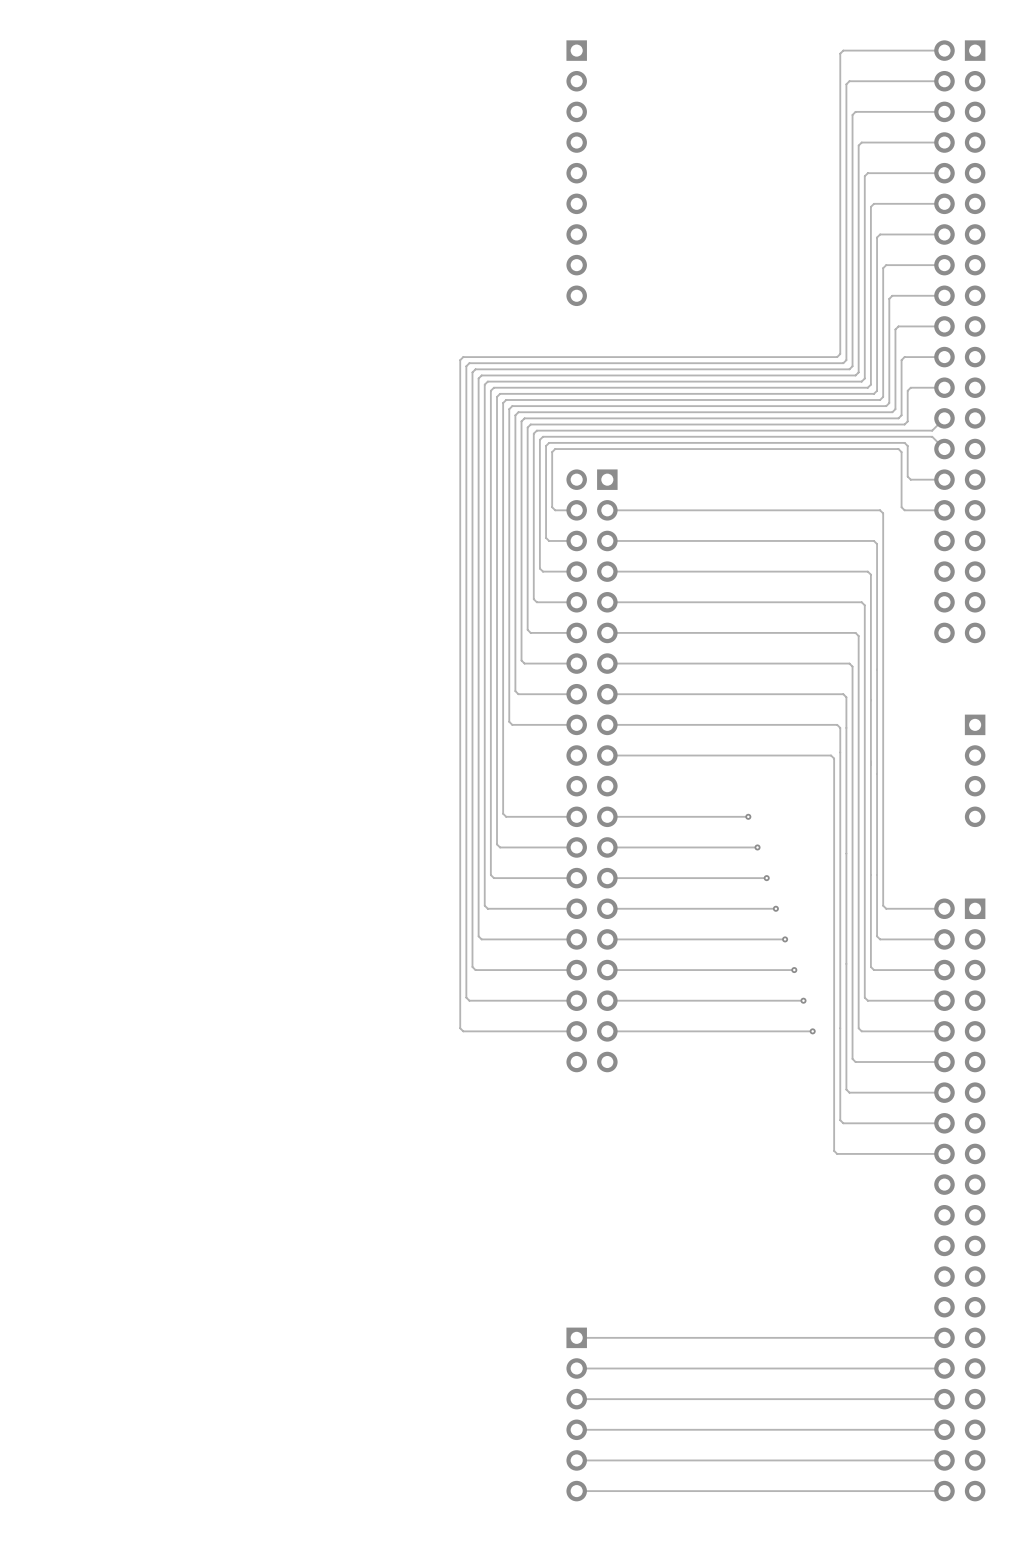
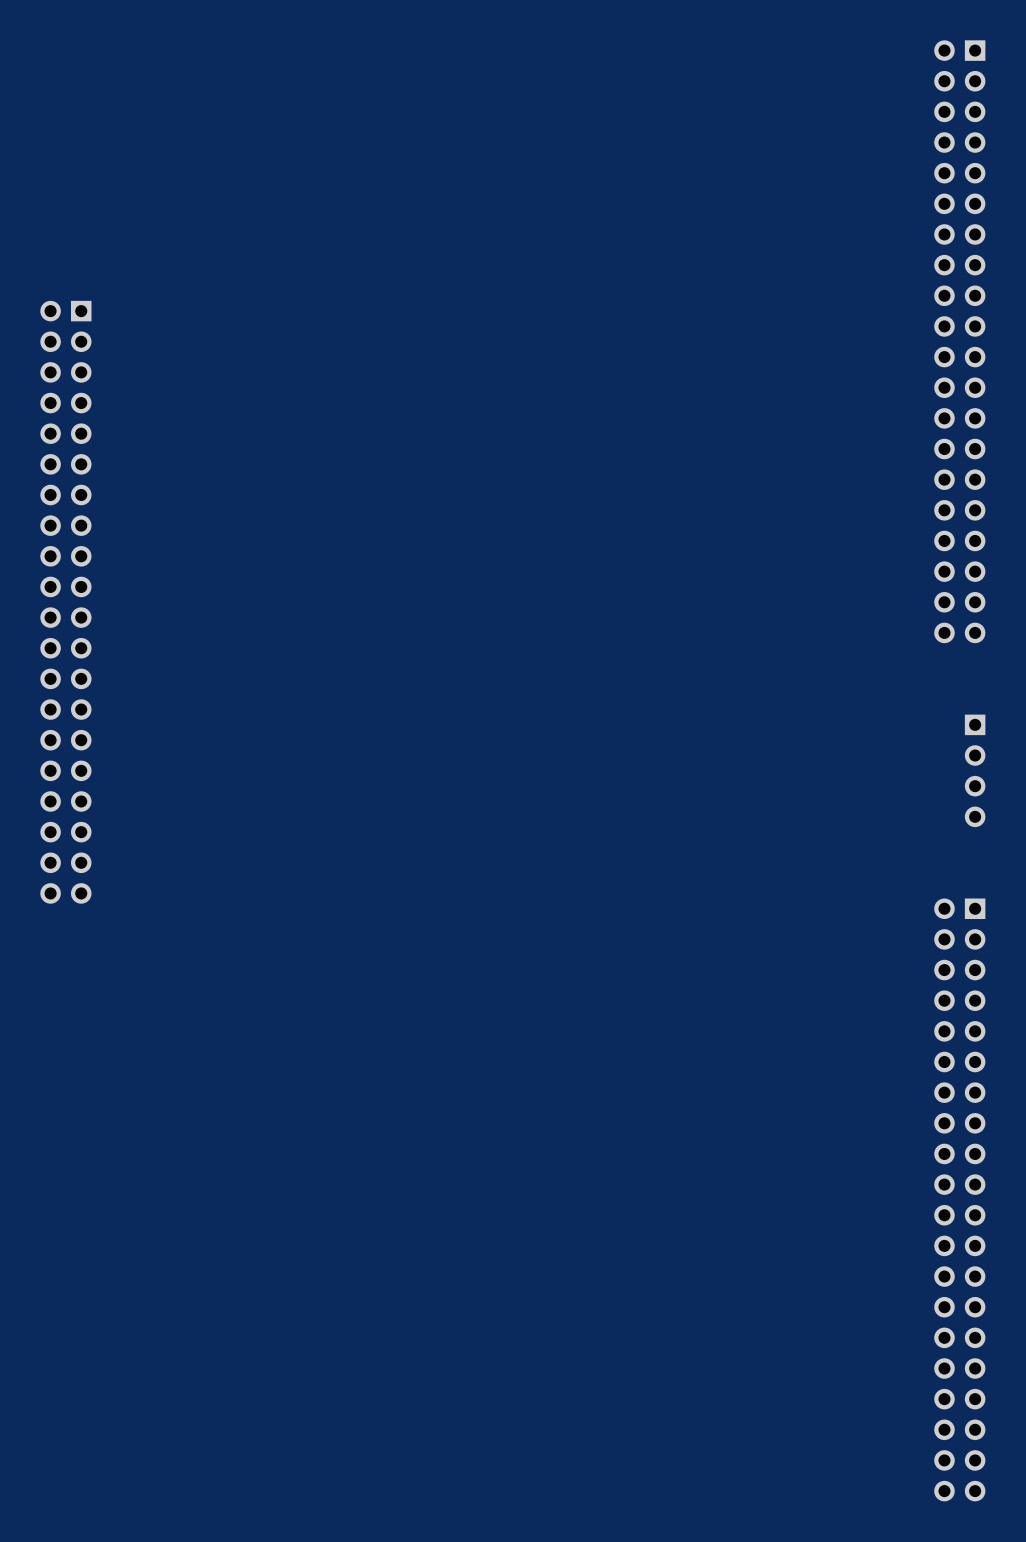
track: (944, 50) (843, 50) (840, 53) (840, 354) (837, 357) (463, 357) (460, 360) (460, 1028) (463, 1031) (576, 1031) -> none
track: (944, 81) (849, 81) (846, 84) (846, 360) (843, 363) (469, 363) (466, 366) (466, 997) (469, 1000) (576, 1000) -> none
track: (944, 111) (855, 111) (852, 114) (852, 366) (849, 369) (475, 369) (472, 372) (472, 966) (475, 970) (576, 970) -> none
track: (944, 142) (861, 142) (858, 145) (858, 372) (855, 375) (481, 375) (478, 378) (478, 936) (481, 939) (576, 939) -> none
part: (576, 173) -> none
track: (944, 173) (867, 173) (864, 176) (864, 378) (861, 381) (487, 381) (484, 384) (484, 905) (487, 908) (576, 908) -> none
track: (944, 203) (873, 203) (870, 206) (870, 384) (867, 387) (493, 387) (490, 390) (490, 875) (493, 878) (576, 878) -> none
track: (944, 234) (880, 234) (877, 237) (877, 390) (873, 393) (500, 393) (497, 396) (497, 844) (500, 847) (576, 847) -> none
track: (944, 265) (886, 265) (883, 268) (883, 396) (880, 399) (506, 399) (503, 403) (503, 813) (506, 816) (576, 816) -> none
track: (944, 295) (892, 295) (889, 298) (889, 403) (886, 406) (512, 406) (509, 409) (509, 721) (512, 724) (576, 724) -> none
track: (944, 326) (898, 326) (895, 329) (895, 409) (892, 412) (518, 412) (515, 415) (515, 691) (518, 694) (576, 694) -> none
track: (944, 357) (904, 357) (901, 360) (901, 415) (898, 418) (524, 418) (521, 421) (521, 660) (524, 663) (576, 663) -> none
track: (944, 387) (910, 387) (907, 390) (907, 421) (904, 424) (530, 424) (527, 427) (527, 629) (530, 632) (576, 632) -> none
track: (944, 418) (932, 430) (536, 430) (533, 433) (533, 599) (536, 602) (576, 602) -> none
track: (944, 449) (932, 436) (542, 436) (539, 439) (539, 568) (542, 571) (576, 571) -> none
track: (944, 479) (910, 479) (907, 476) (907, 445) (904, 442) (549, 442) (546, 445) (546, 537) (549, 540) (576, 540) -> none
track: (607, 510) (880, 510) (883, 513) (883, 905) (886, 908) (944, 908) -> none
track: (944, 510) (904, 510) (901, 507) (901, 452) (898, 449) (555, 449) (552, 452) (552, 507) (555, 510) (576, 510) -> none
track: (607, 540) (873, 540) (877, 544) (877, 936) (880, 939) (944, 939) -> none
track: (607, 571) (867, 571) (870, 574) (870, 966) (873, 970) (944, 970) -> none
part: none -> (65, 602)
track: (607, 602) (861, 602) (864, 605) (864, 997) (867, 1000) (944, 1000) -> none
track: (607, 632) (855, 632) (858, 635) (858, 1028) (861, 1031) (944, 1031) -> none
track: (607, 663) (849, 663) (852, 666) (852, 1058) (855, 1062) (944, 1062) -> none
track: (607, 694) (843, 694) (846, 697) (846, 1089) (849, 1092) (944, 1092) -> none
track: (607, 724) (837, 724) (840, 727) (840, 1120) (843, 1123) (944, 1123) -> none
track: (607, 755) (831, 755) (834, 758) (834, 1150) (837, 1153) (944, 1153) -> none
part: (592, 770) -> none
track: (748, 816) (607, 816) -> none
via: (748, 816) -> none
track: (757, 847) (607, 847) -> none
via: (757, 847) -> none
track: (766, 878) (607, 878) -> none
via: (766, 878) -> none
track: (775, 908) (607, 908) -> none
via: (775, 908) -> none
track: (785, 939) (607, 939) -> none
via: (785, 939) -> none
track: (794, 970) (607, 970) -> none
via: (794, 970) -> none
track: (803, 1000) (607, 1000) -> none
via: (803, 1000) -> none
track: (812, 1031) (607, 1031) -> none
via: (812, 1031) -> none
track: (944, 1337) (576, 1337) -> none
track: (944, 1368) (576, 1368) -> none
track: (944, 1399) (576, 1399) -> none
part: (576, 1414) -> none
track: (944, 1429) (576, 1429) -> none
track: (944, 1460) (576, 1460) -> none
track: (944, 1491) (576, 1491) -> none

